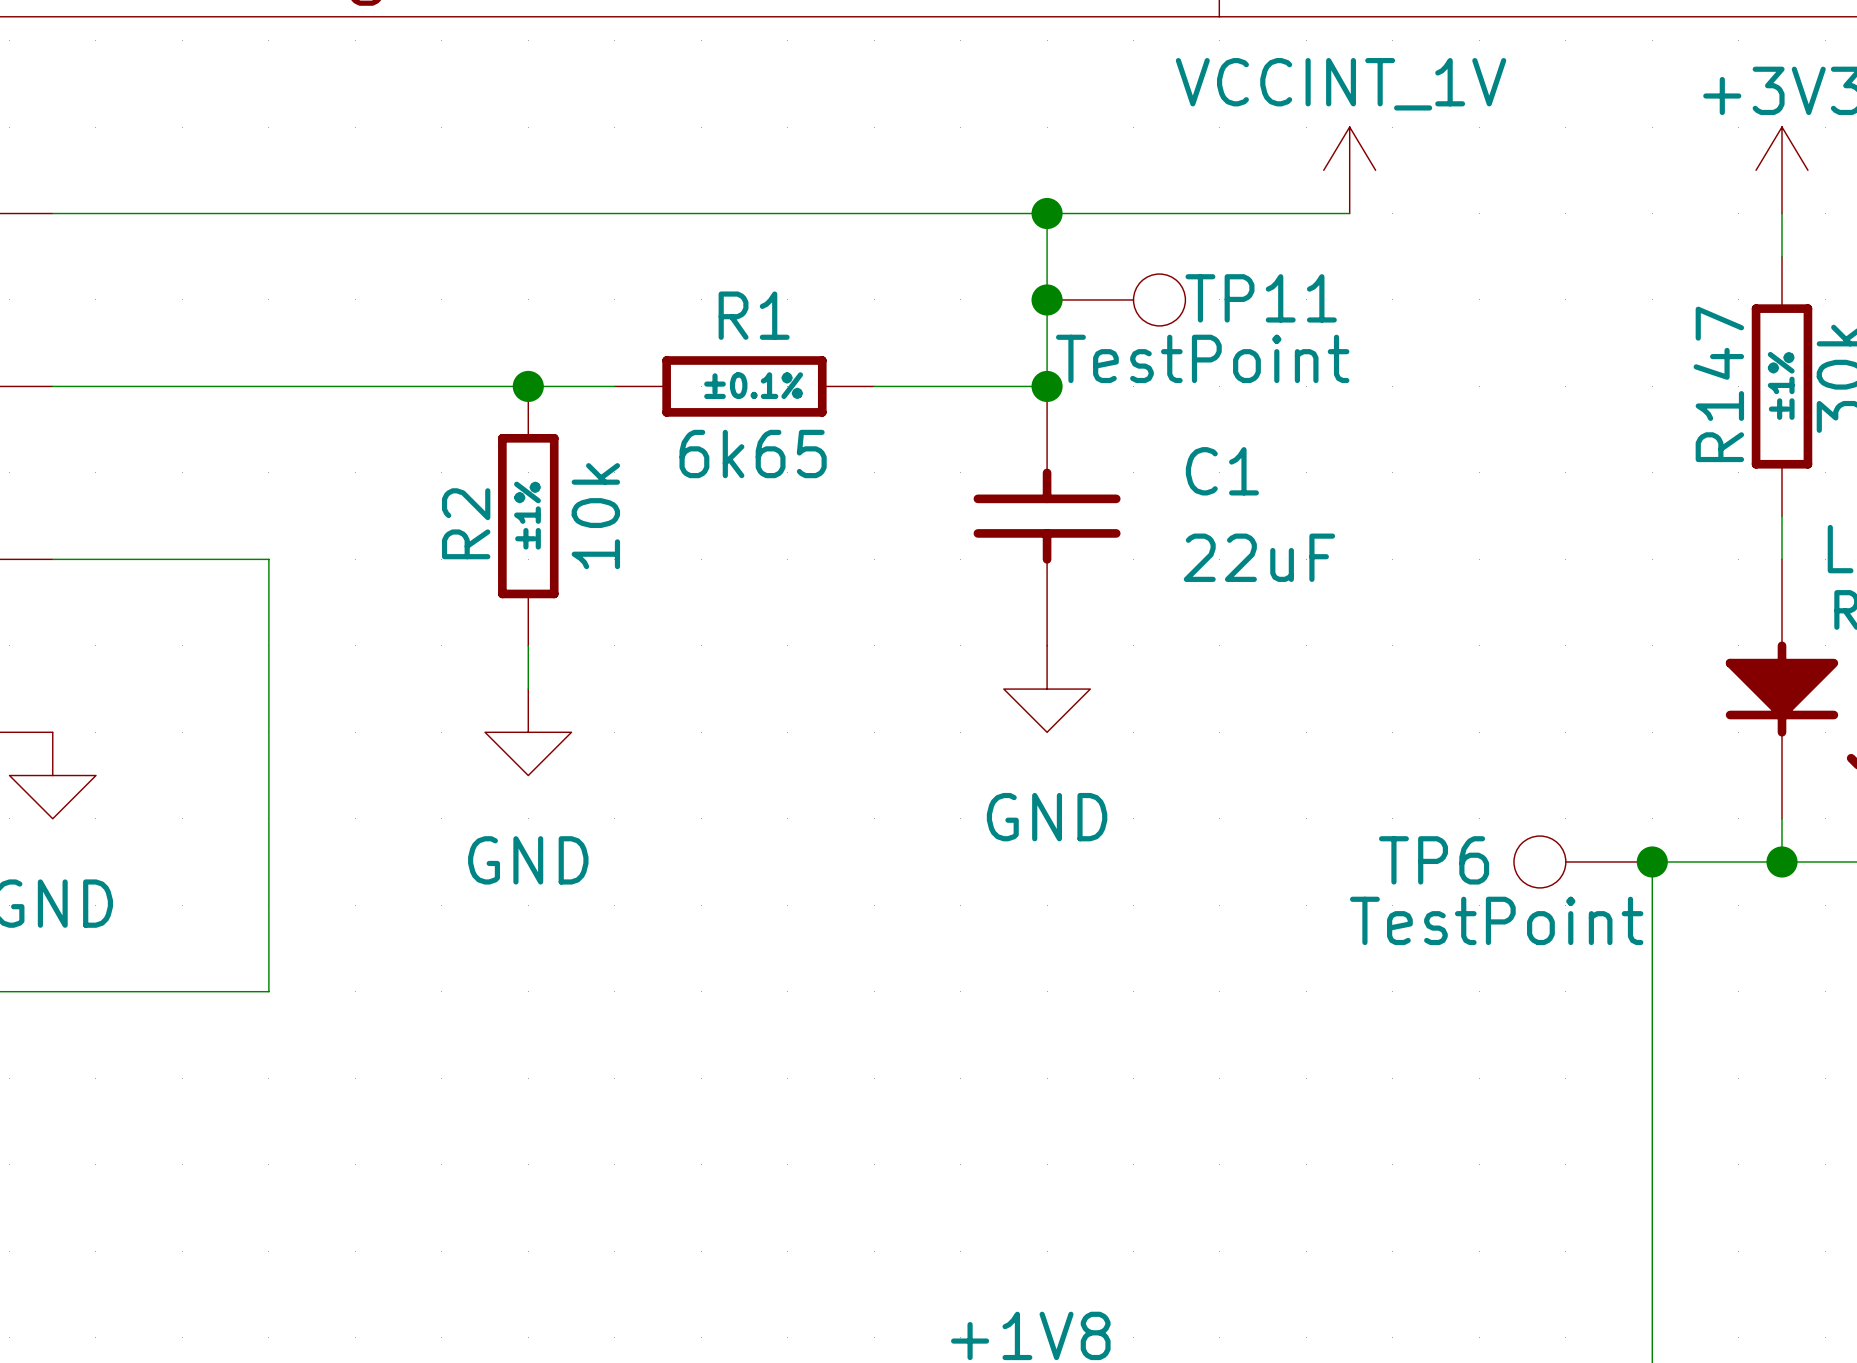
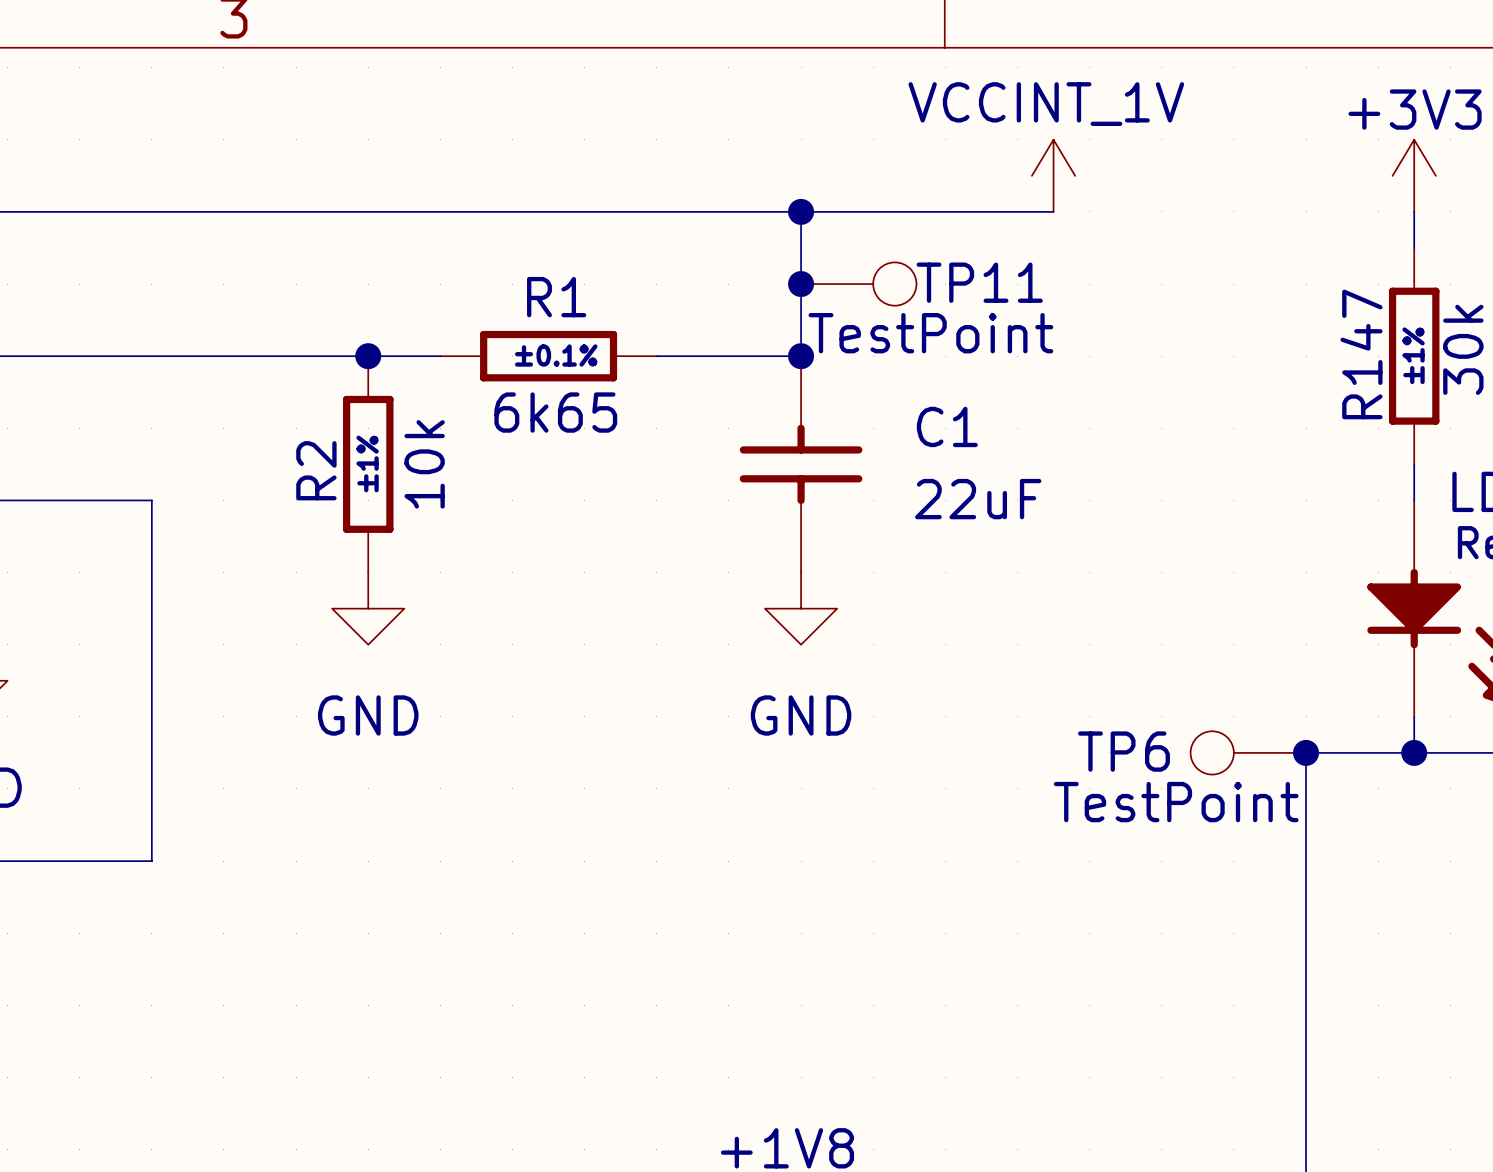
power symbol position: GND (528, 732) -> GND (368, 608)

